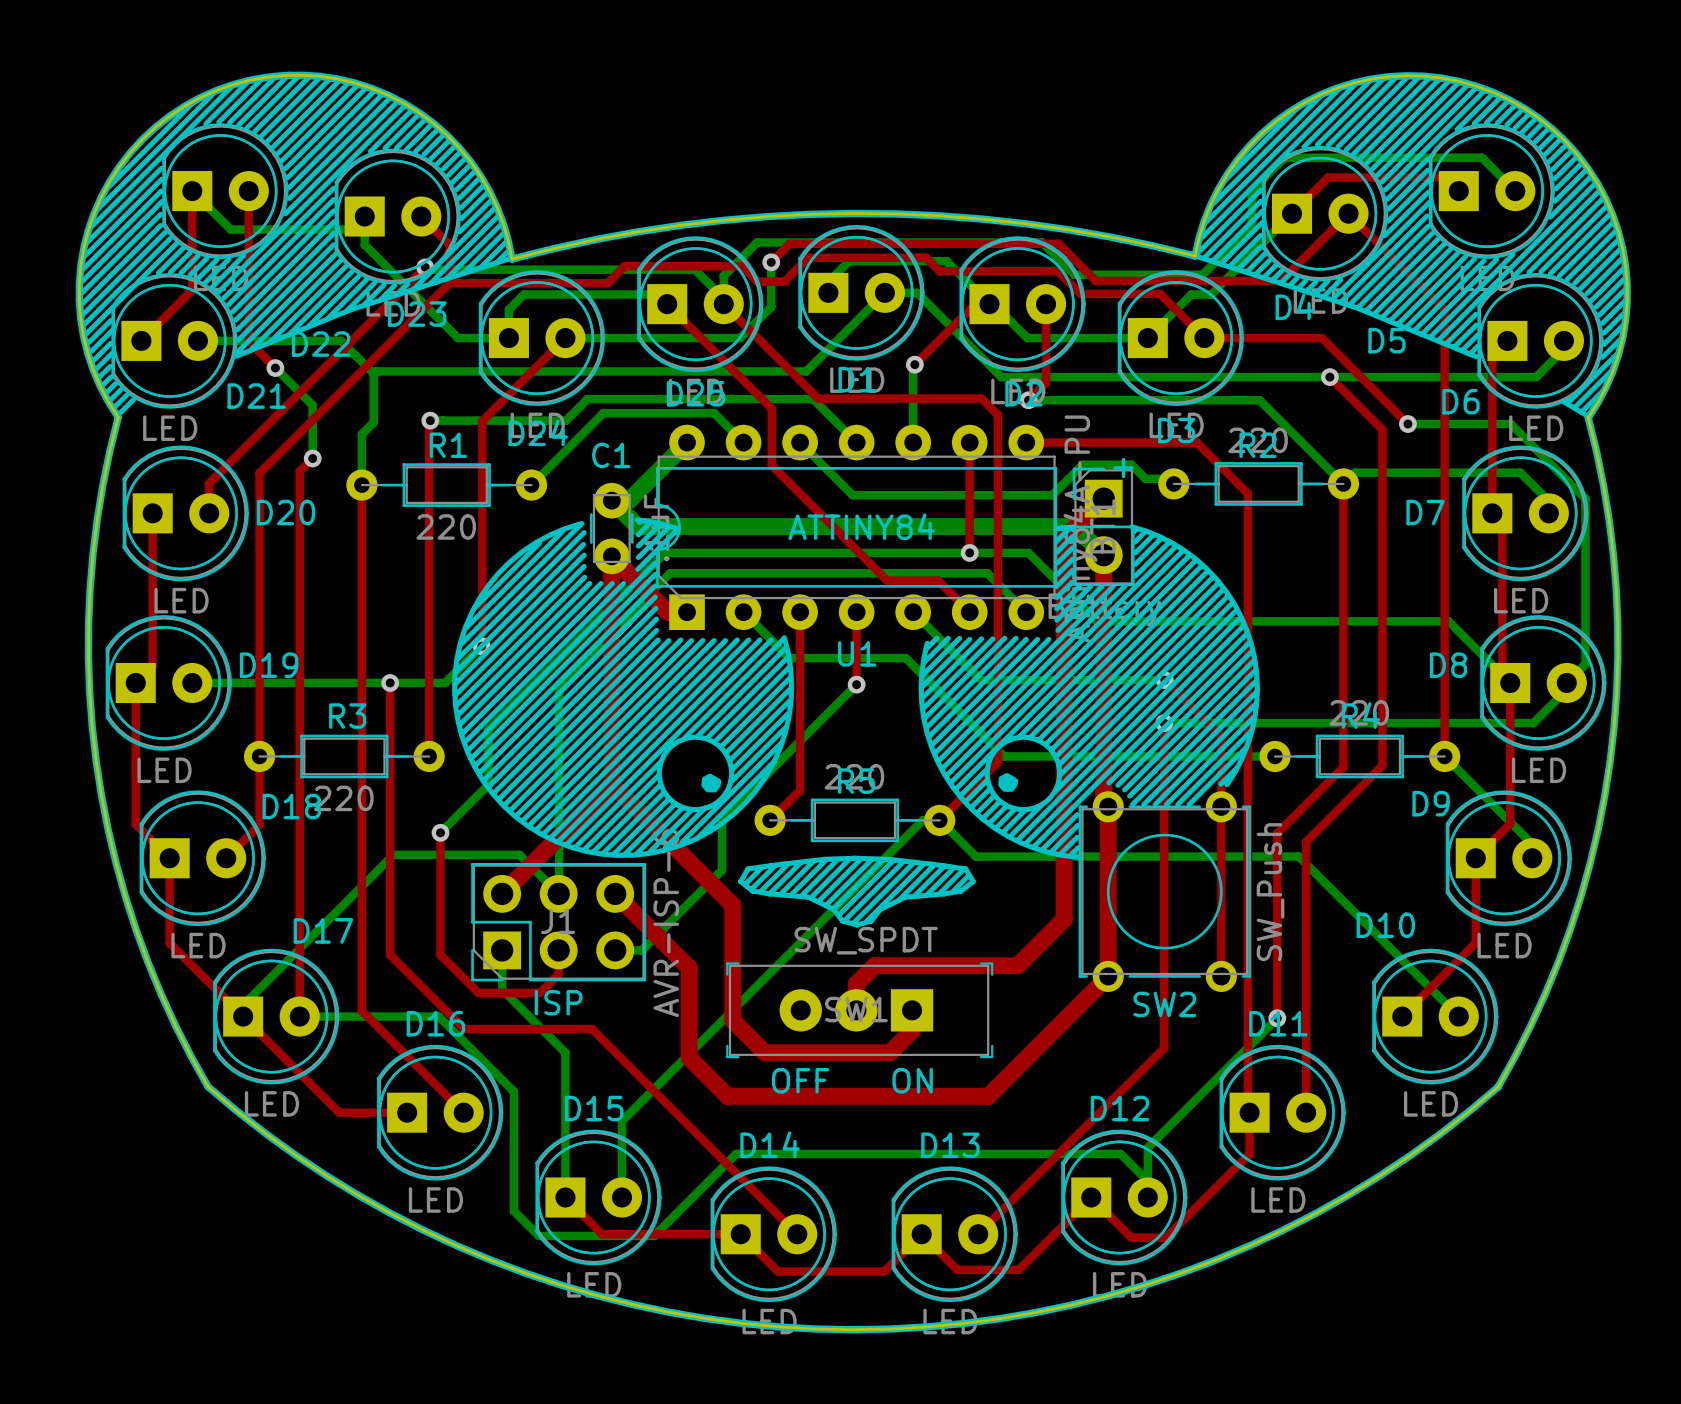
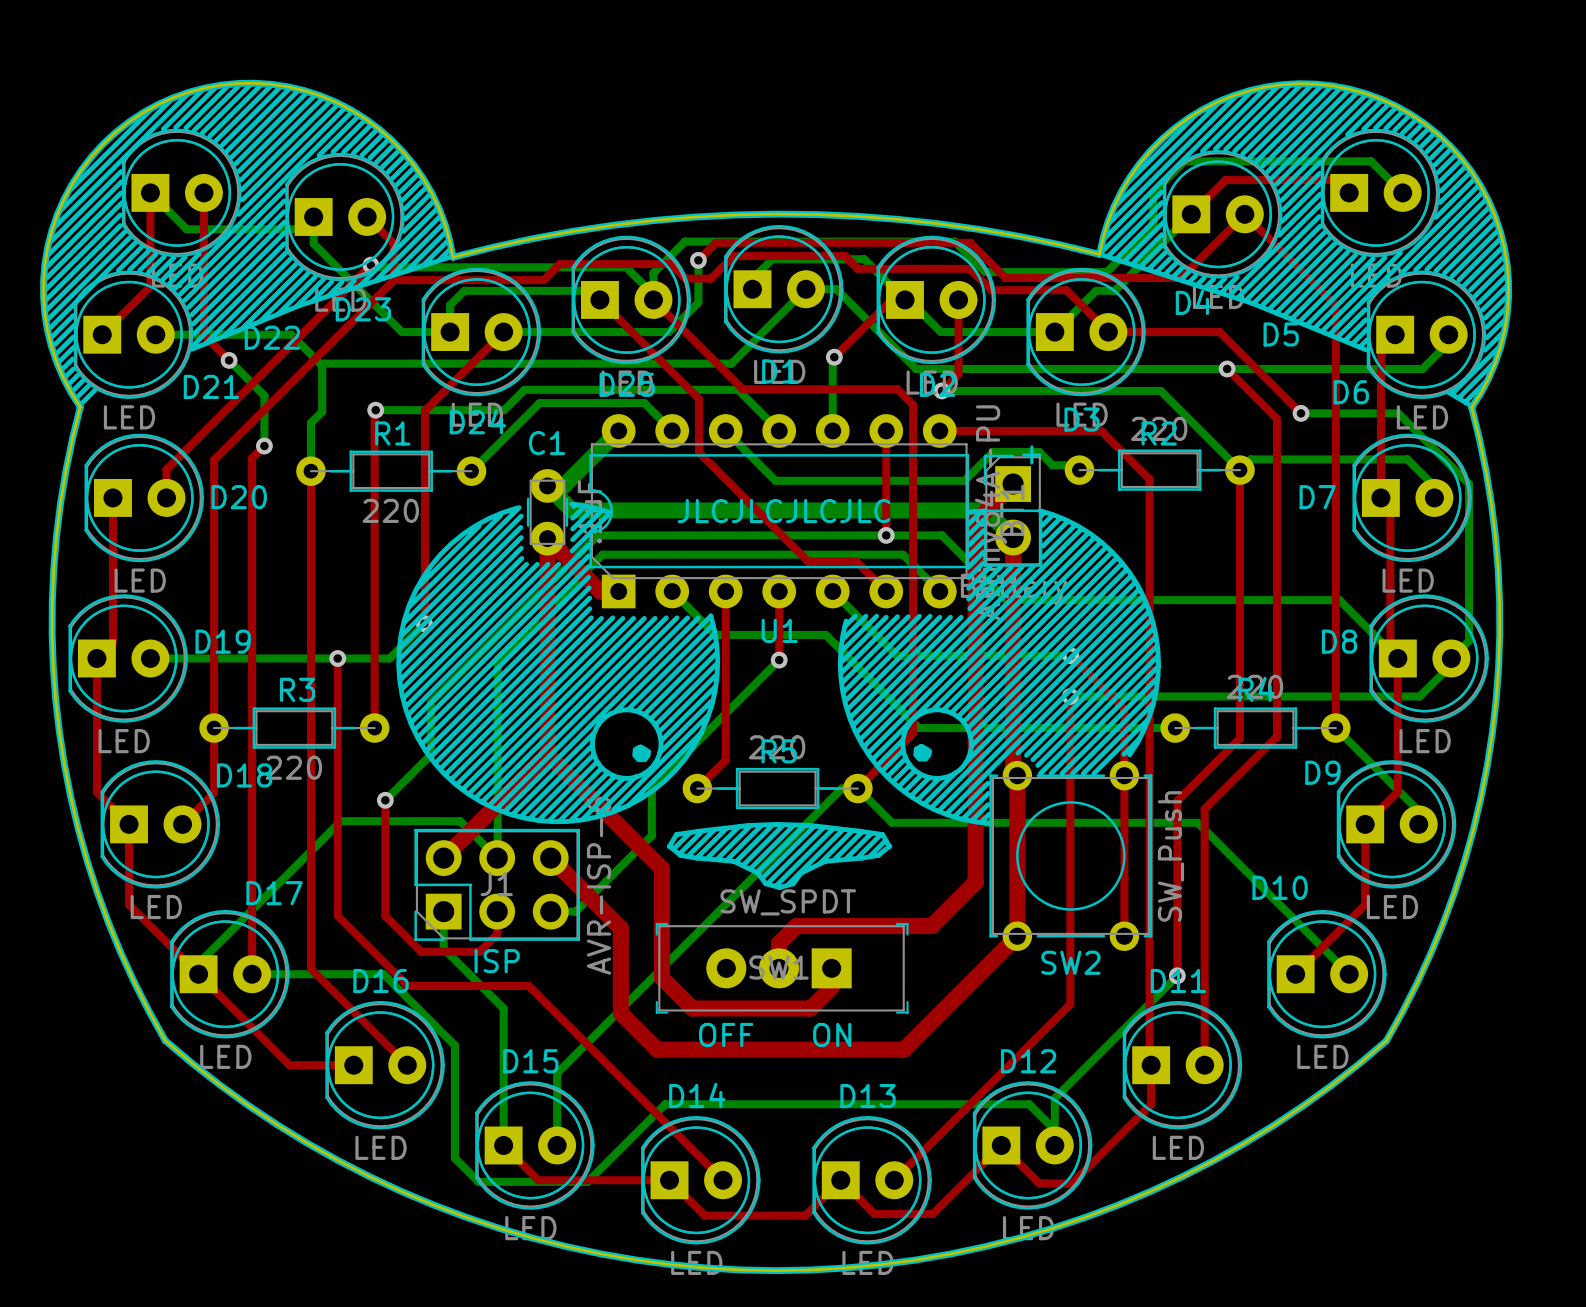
text: ATTINY84 (861, 526) -> JLCJLCJLCJLC (784, 511)

